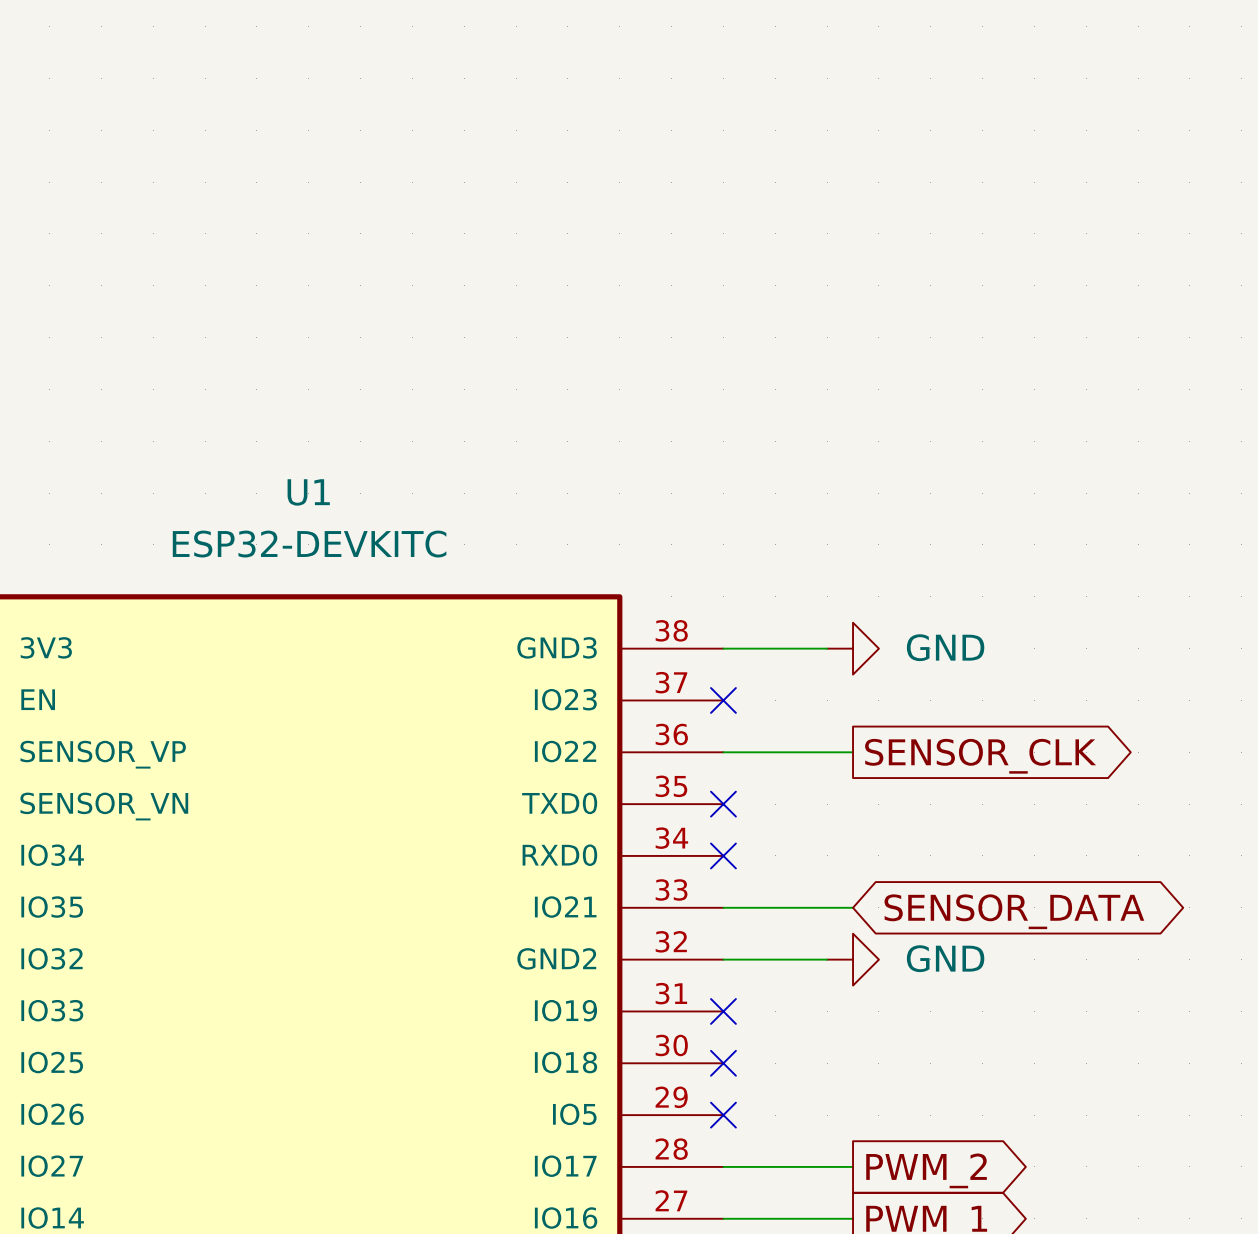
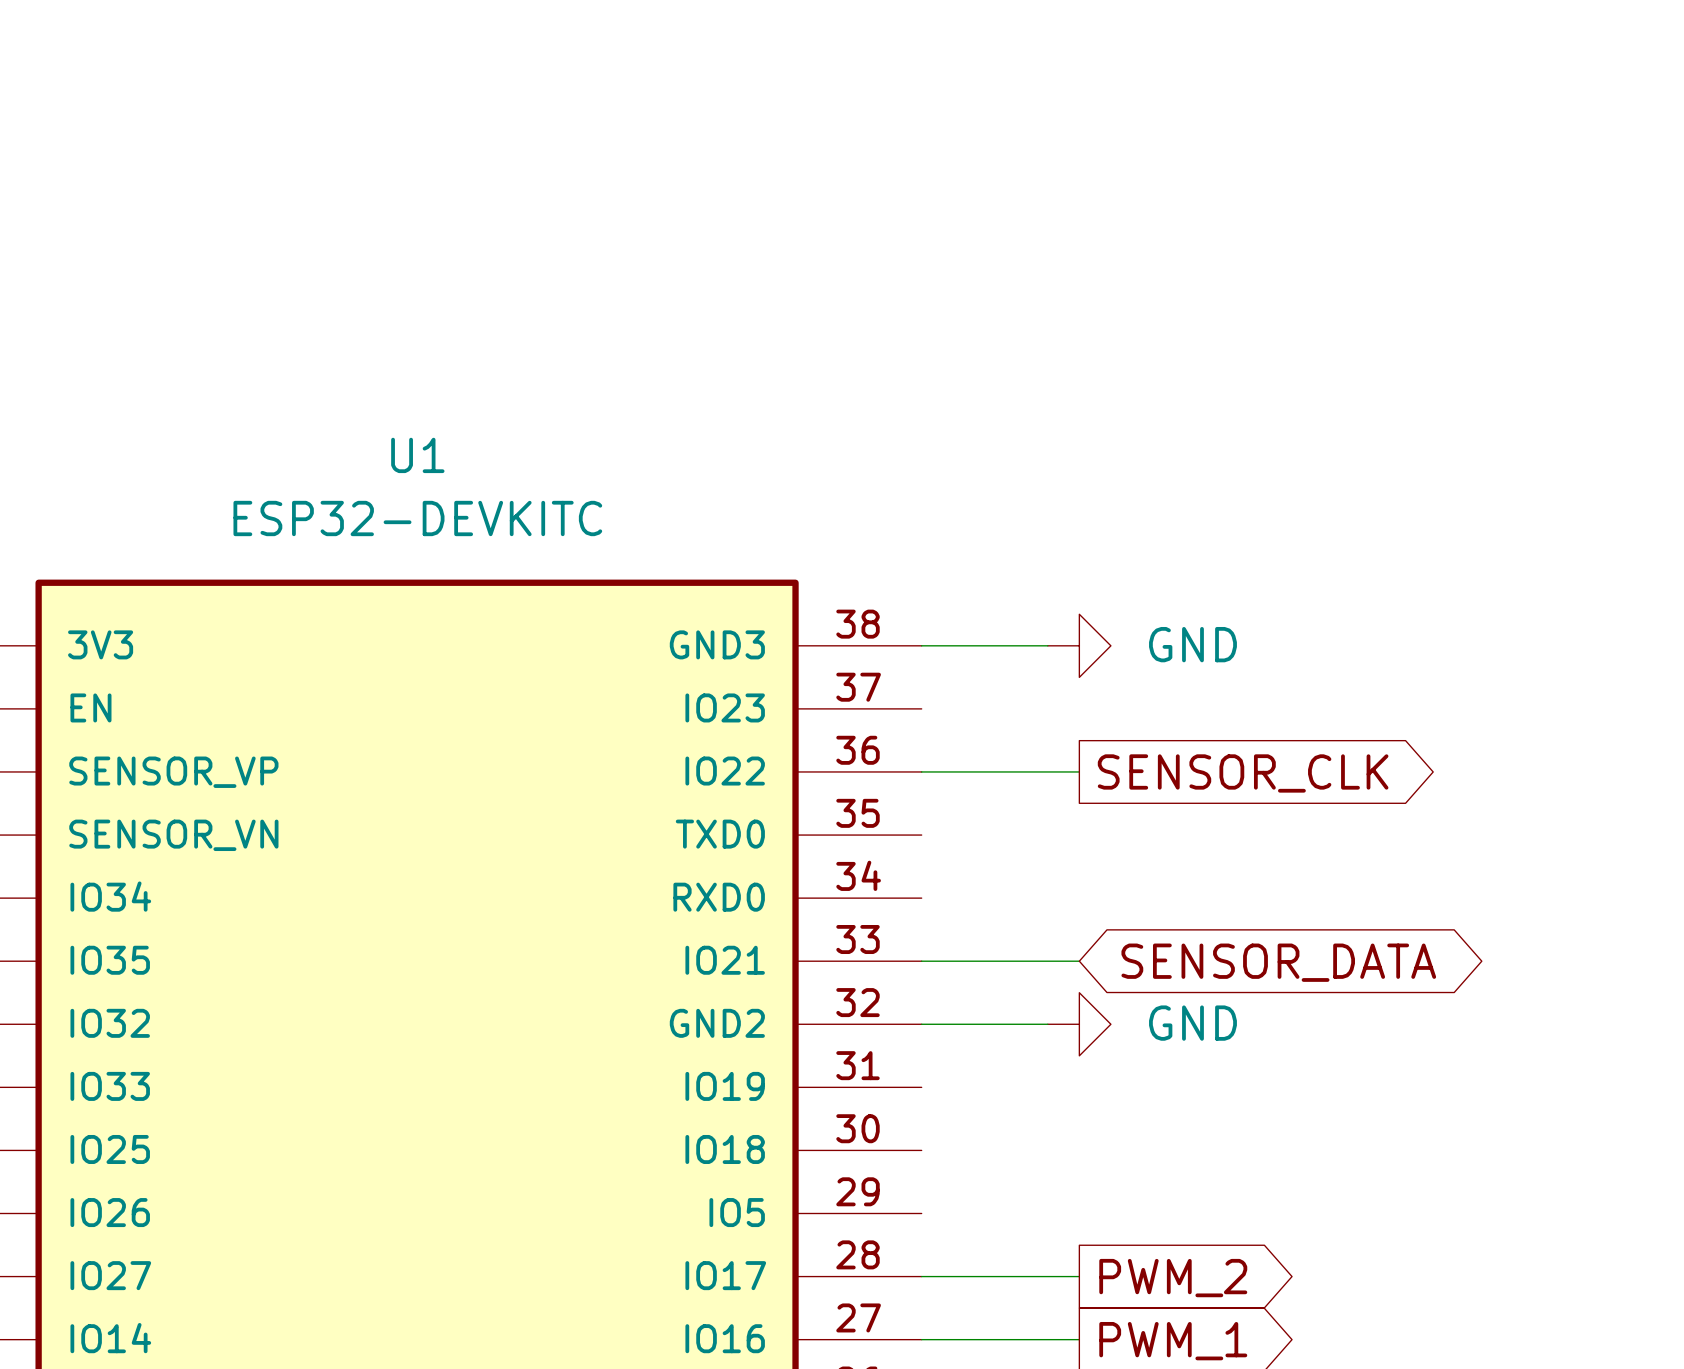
no-connect mark: (723, 700) -> none
no-connect mark: (723, 804) -> none
no-connect mark: (723, 855) -> none
no-connect mark: (723, 1011) -> none
no-connect mark: (723, 1063) -> none
no-connect mark: (723, 1115) -> none

